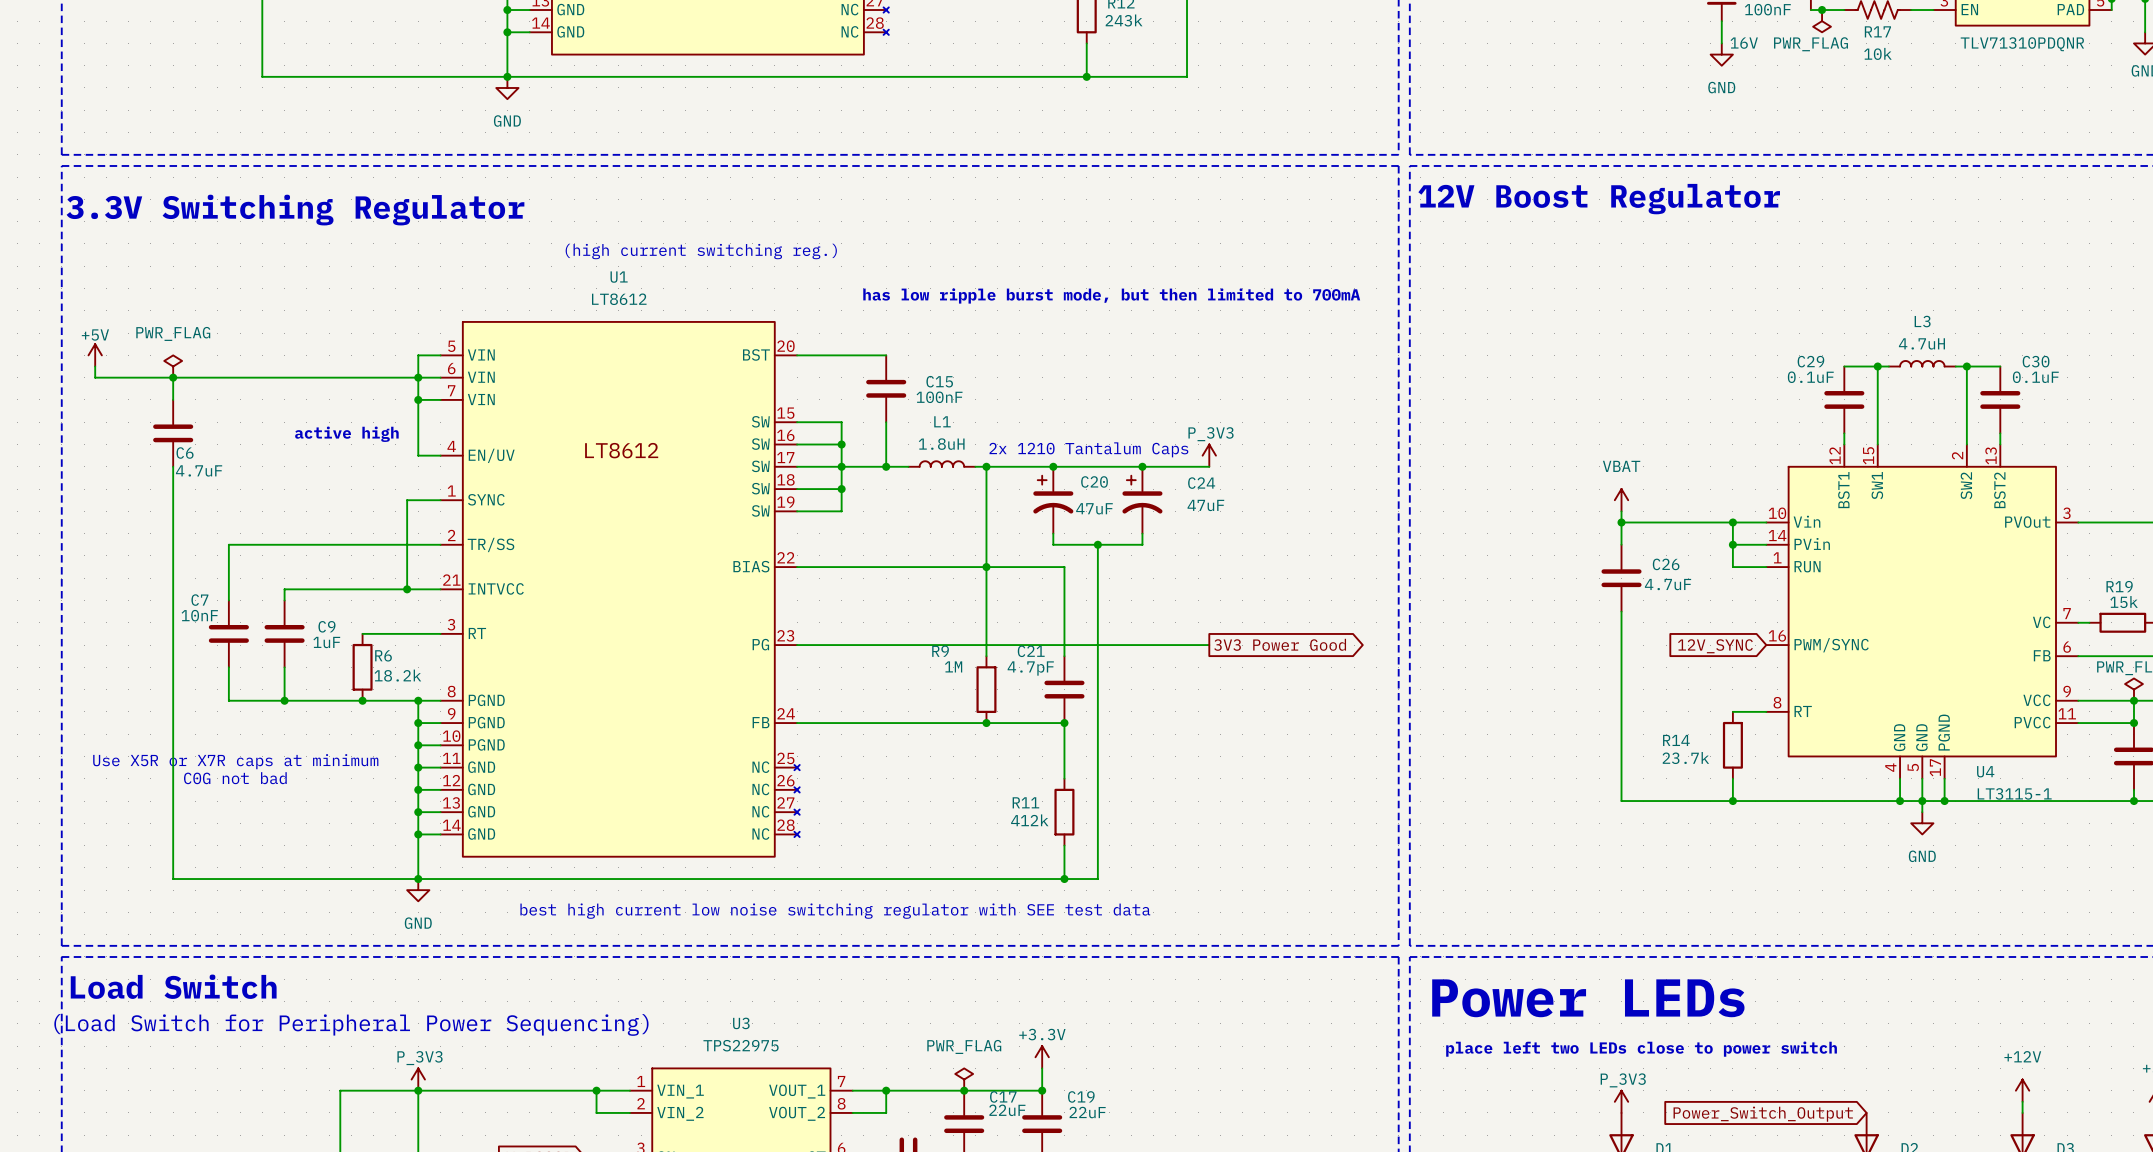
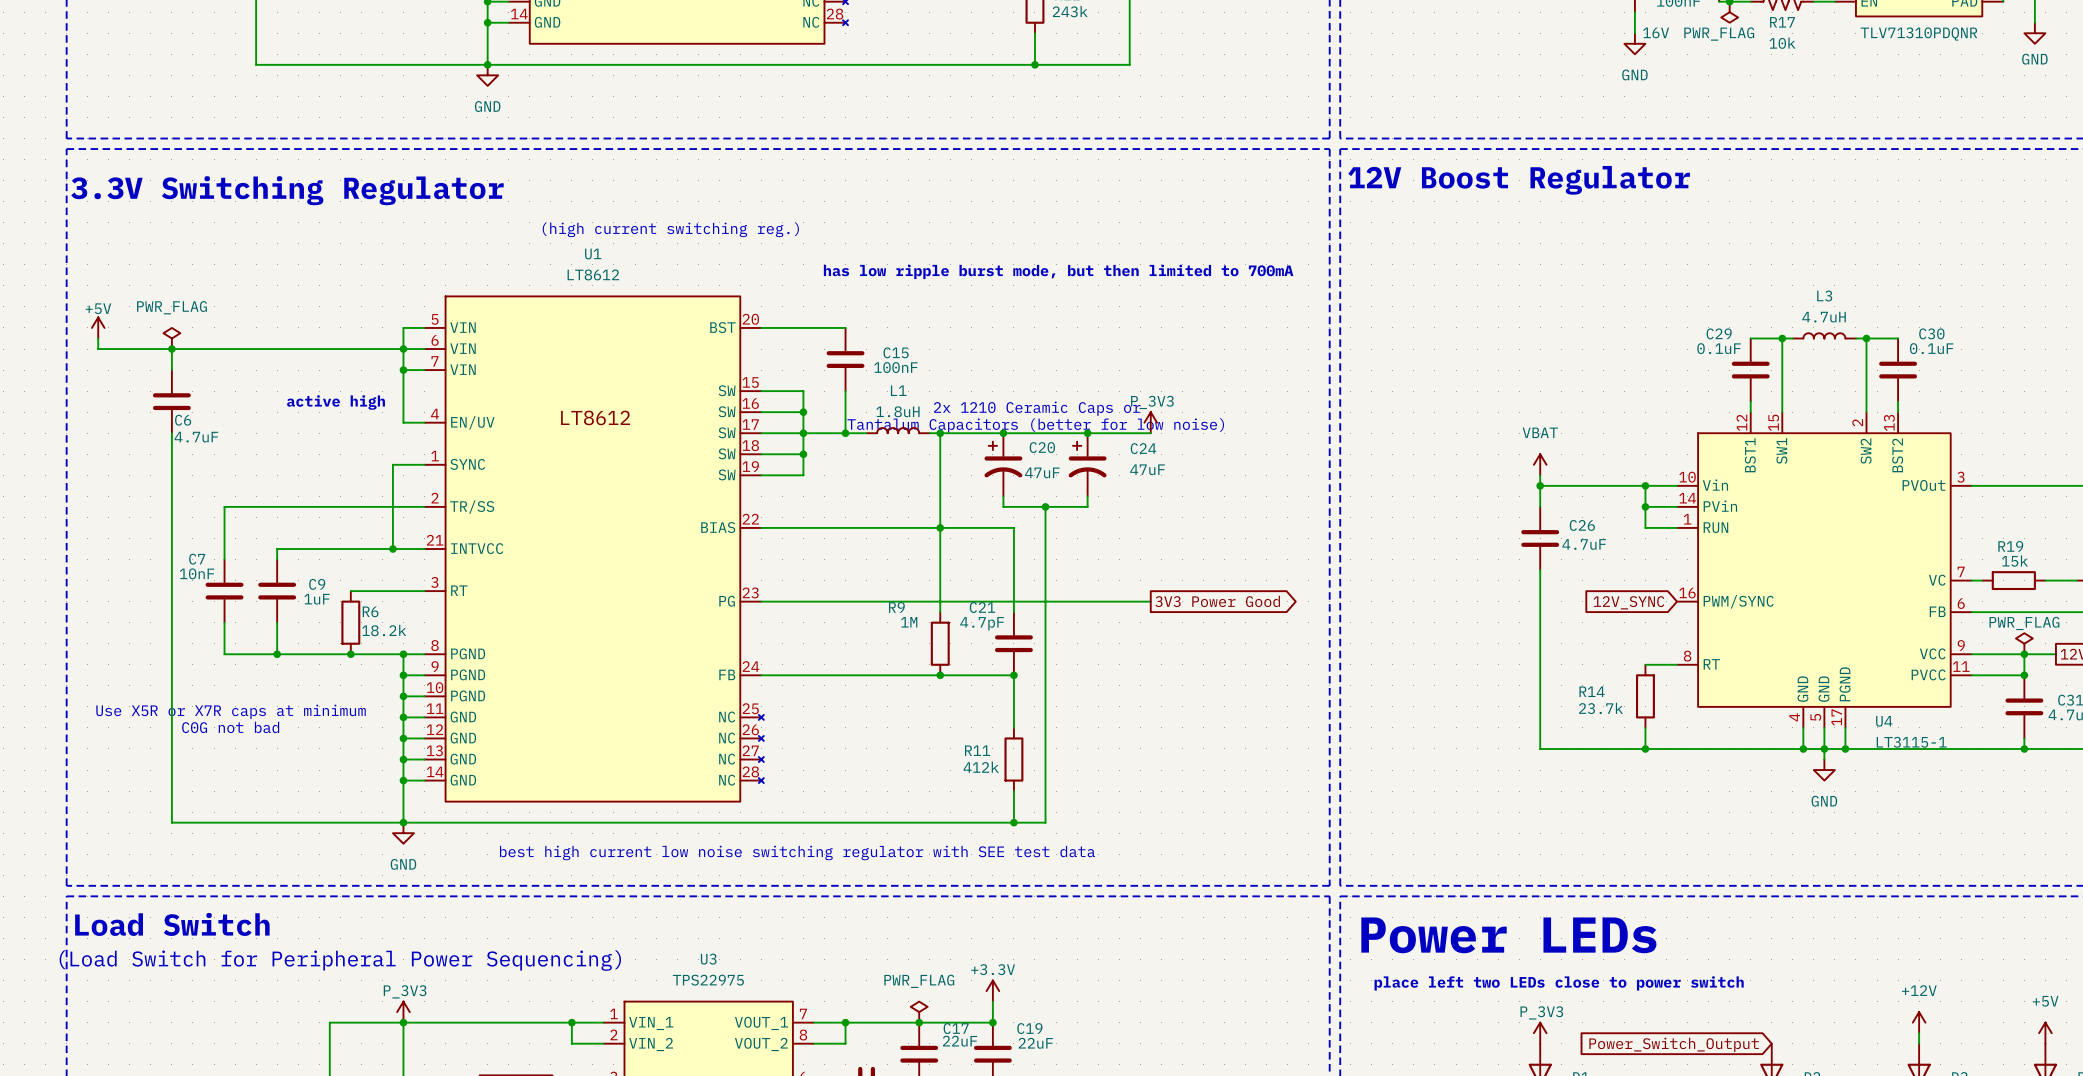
text: 2x 1210 Tantalum Caps (1088, 449) -> 2x 1210 Ceramic Caps or (1037, 408)
text: none -> Tantalum Capacitors (better for low noise) (1035, 425)

